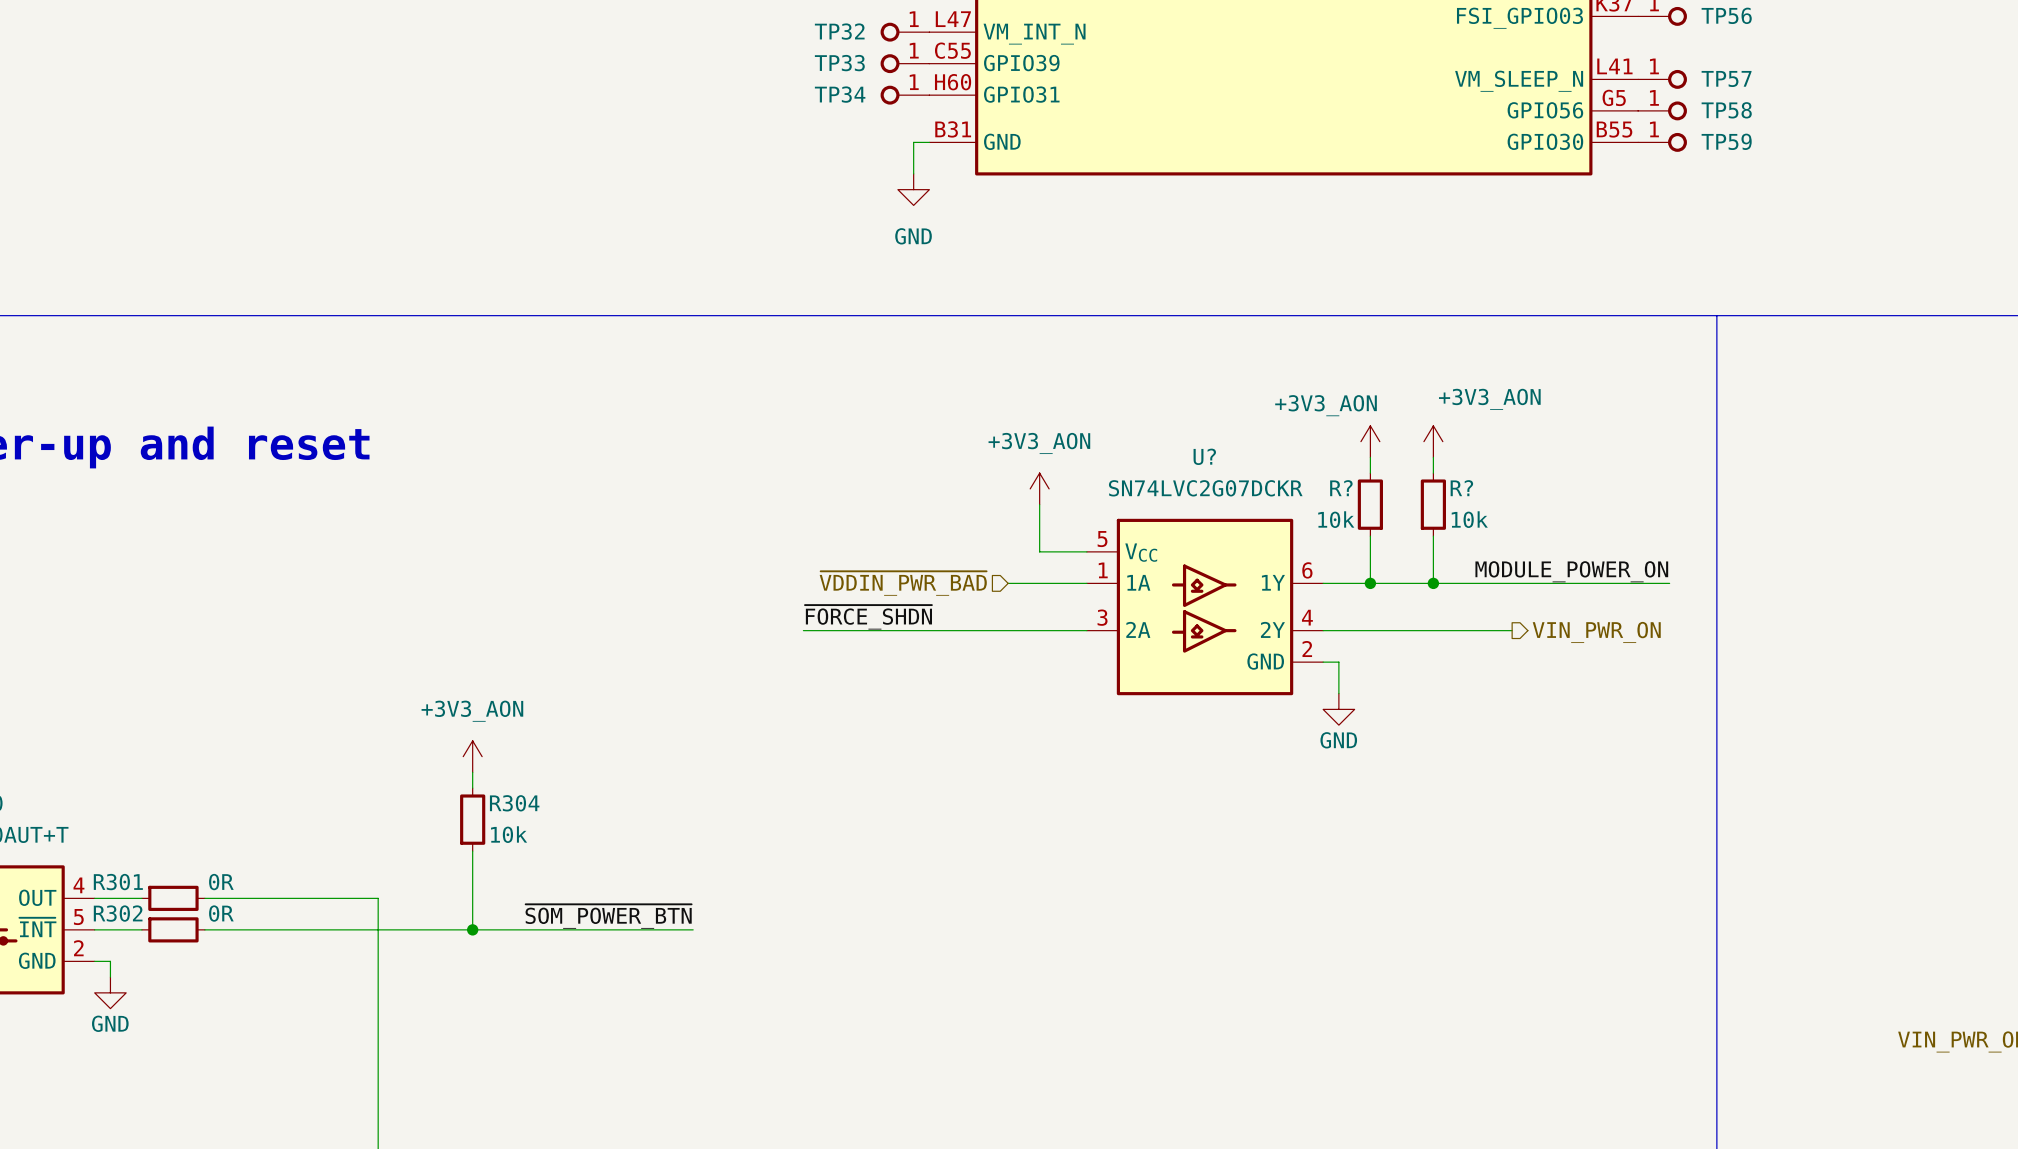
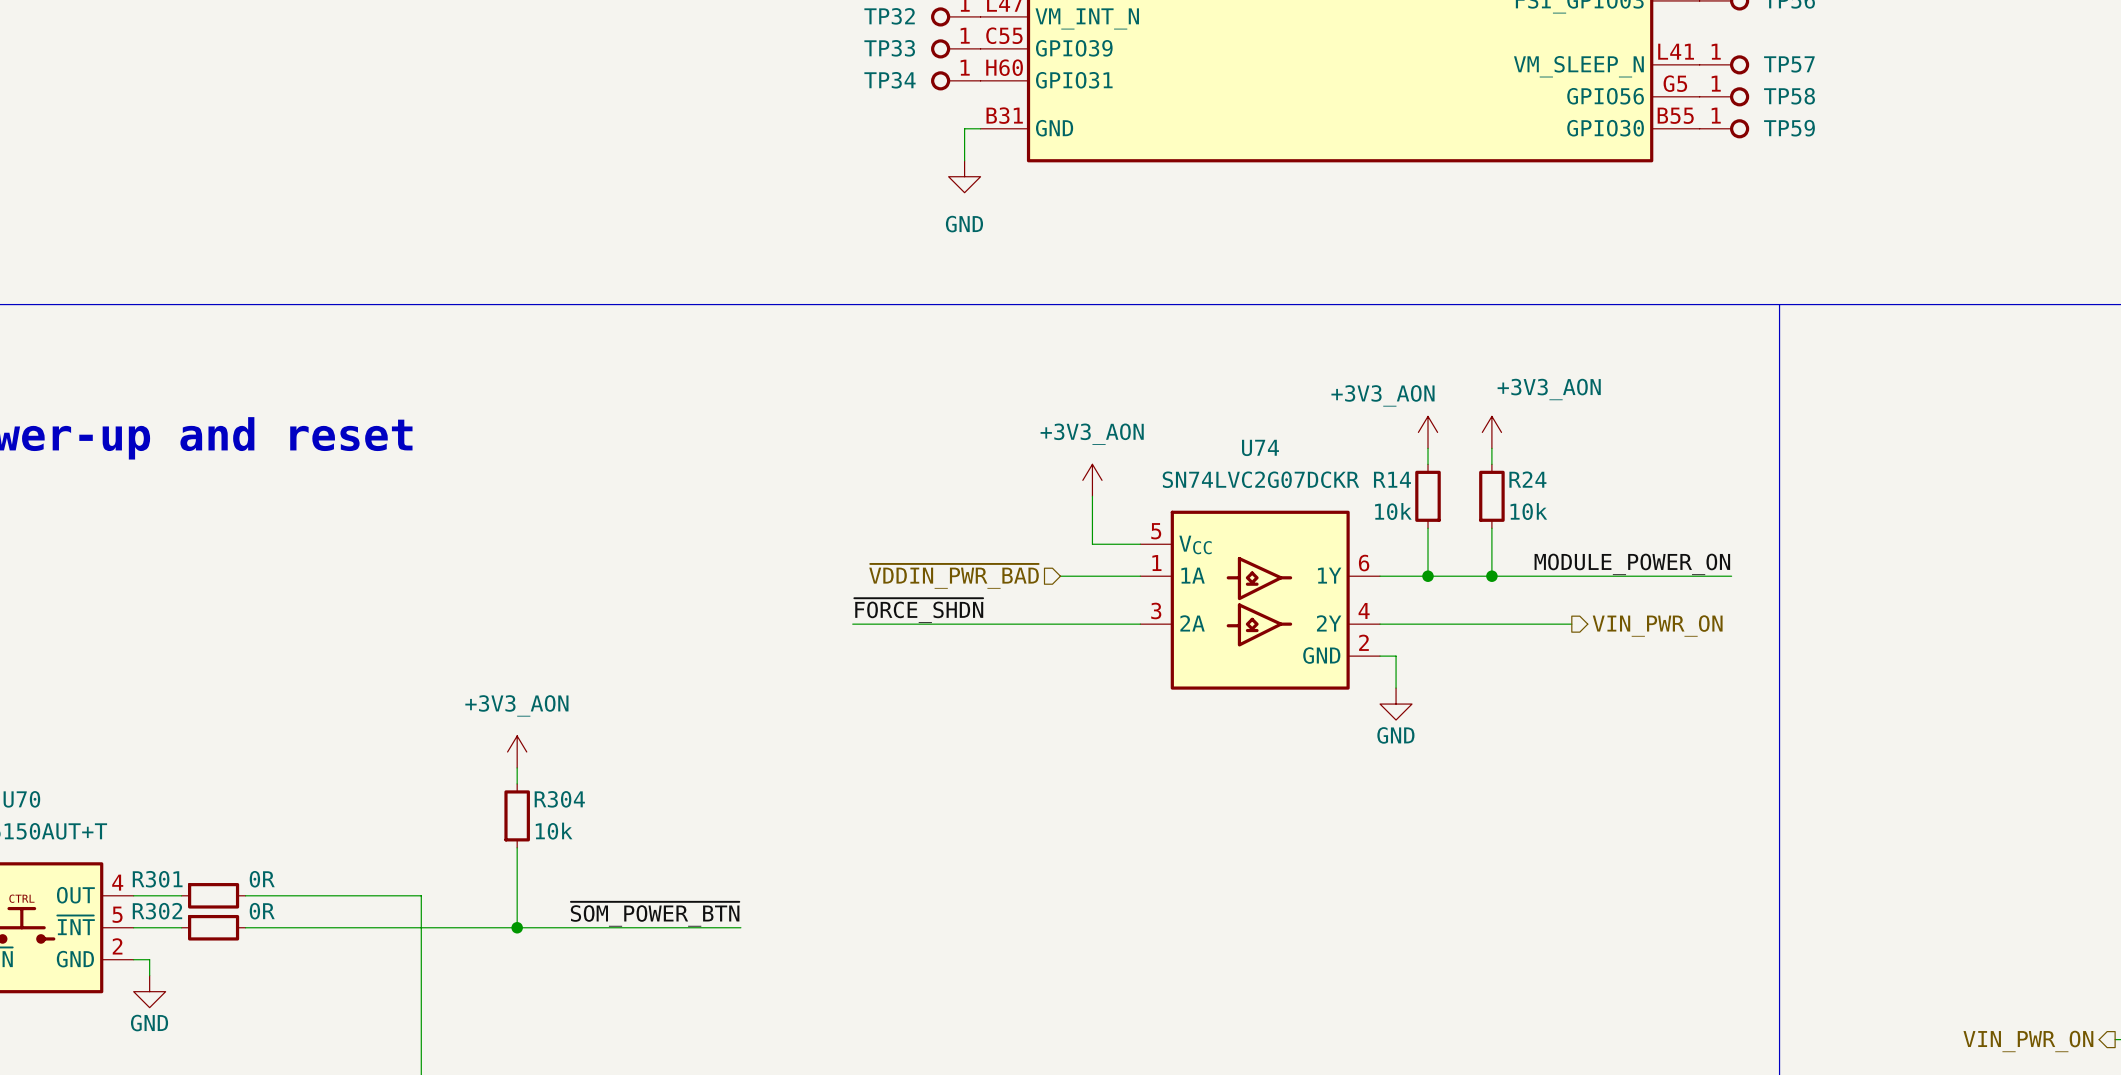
U? name: U? (1204, 456) -> U74 (1260, 447)
R? name: R? (1341, 488) -> R14 (1392, 479)
R? name: R? (1461, 488) -> R24 (1527, 479)

